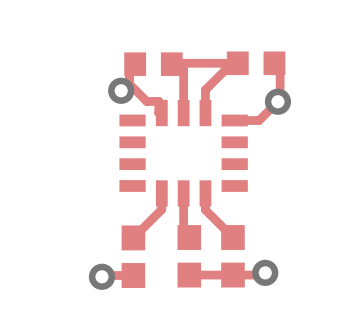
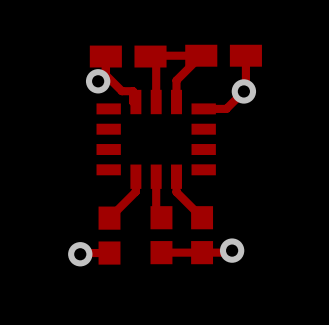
part footprint: [226, 51, 286, 76] -> [185, 44, 262, 67]
part footprint: [124, 52, 183, 76] -> [89, 45, 167, 68]

